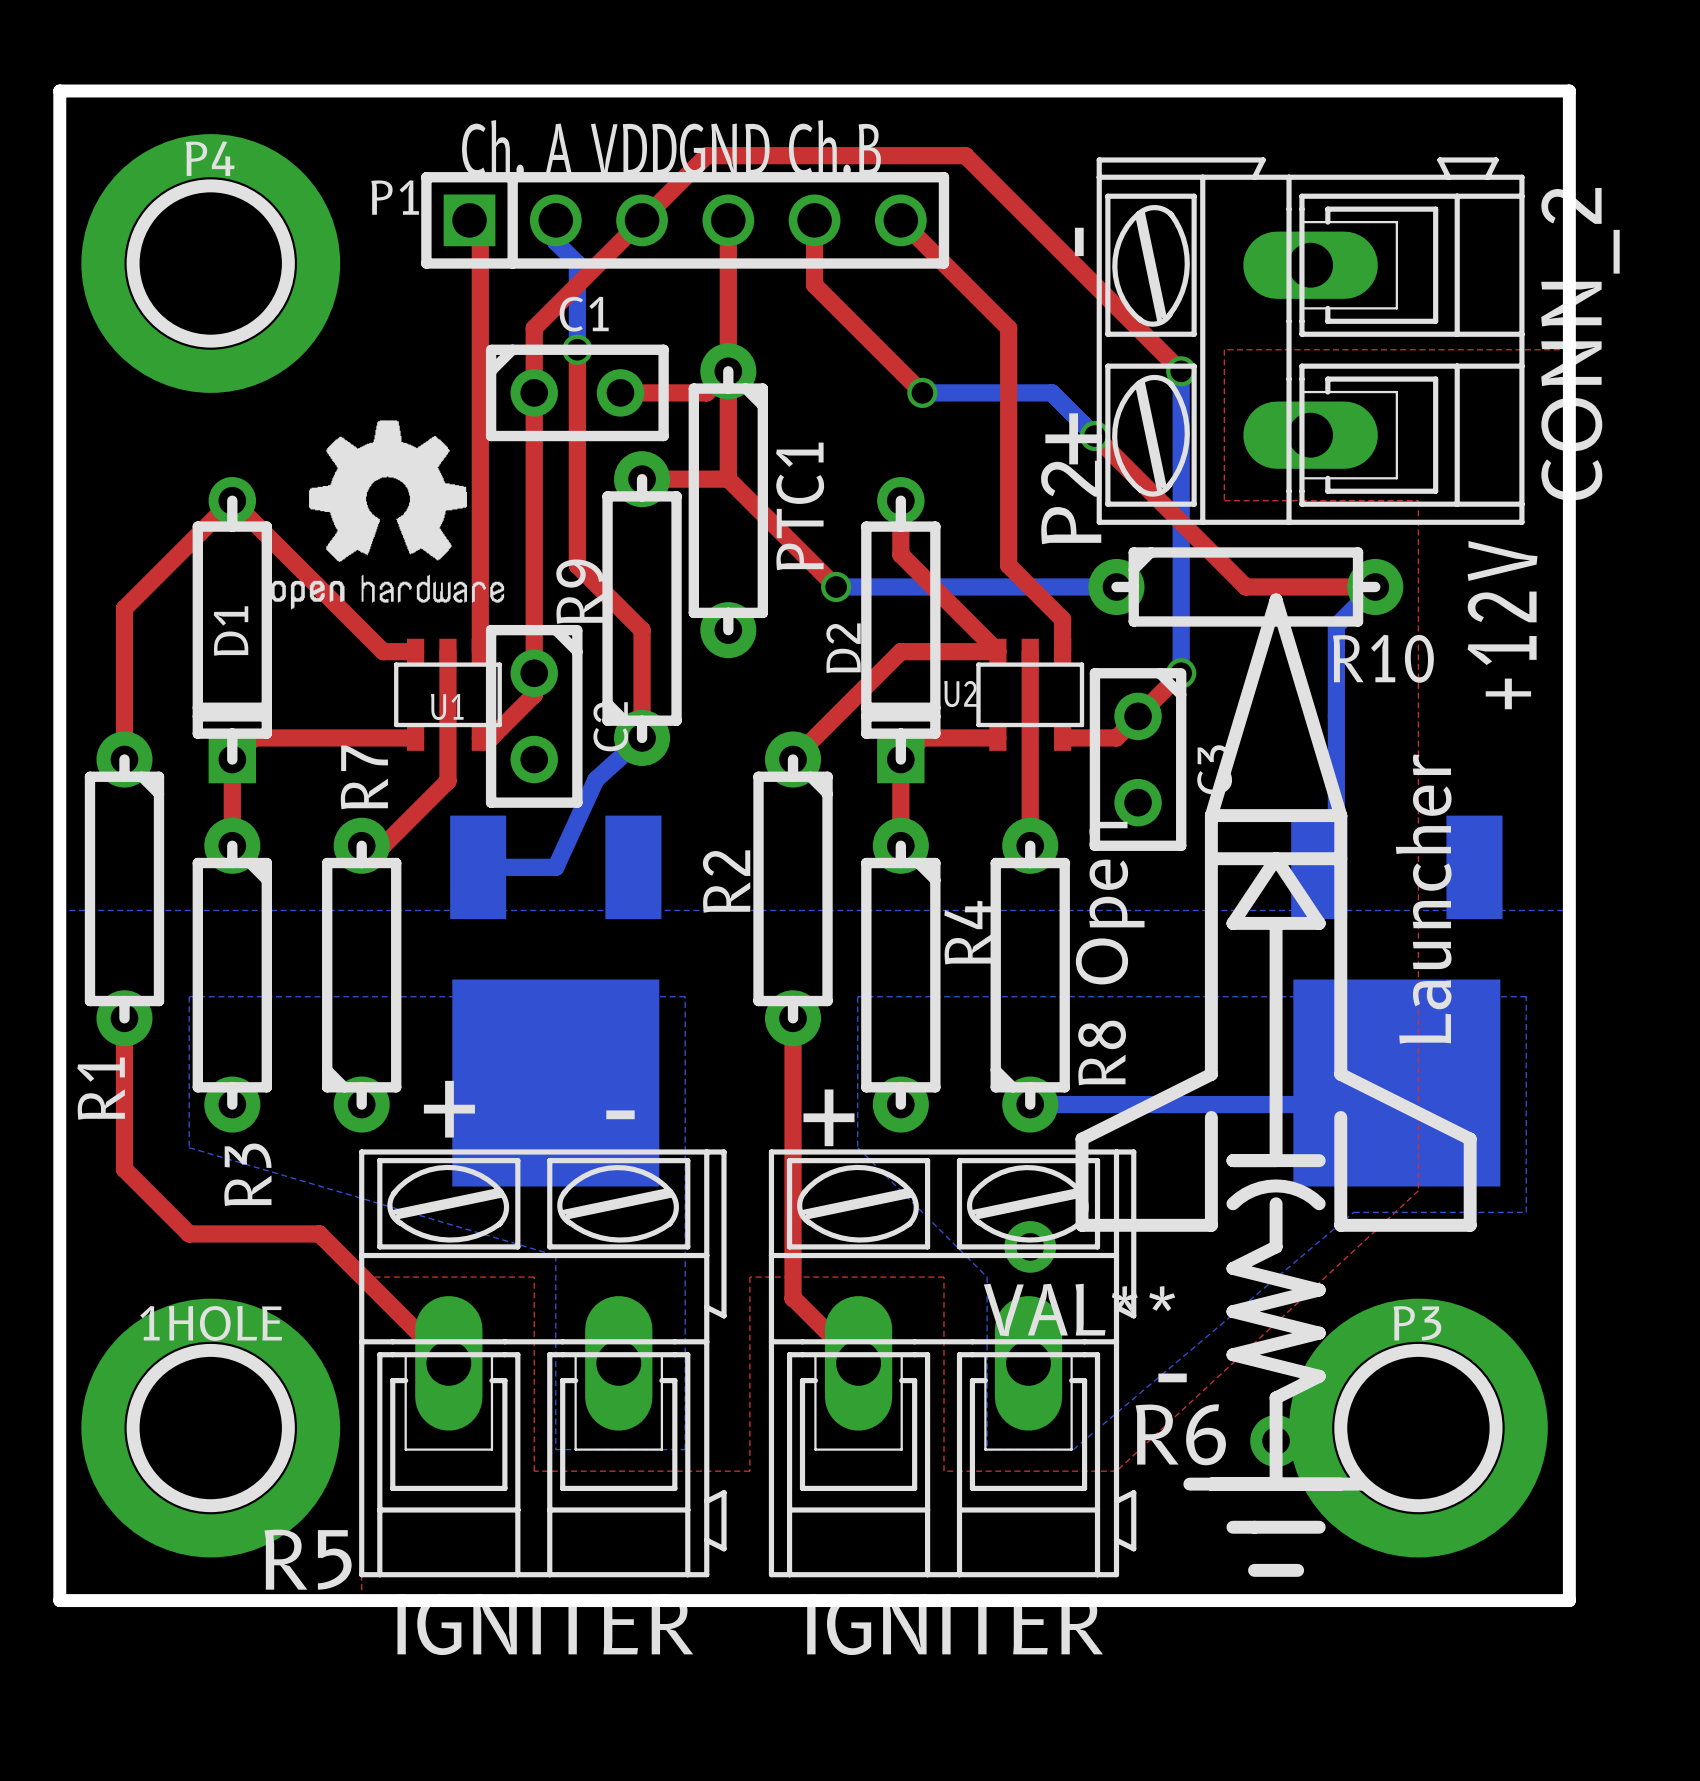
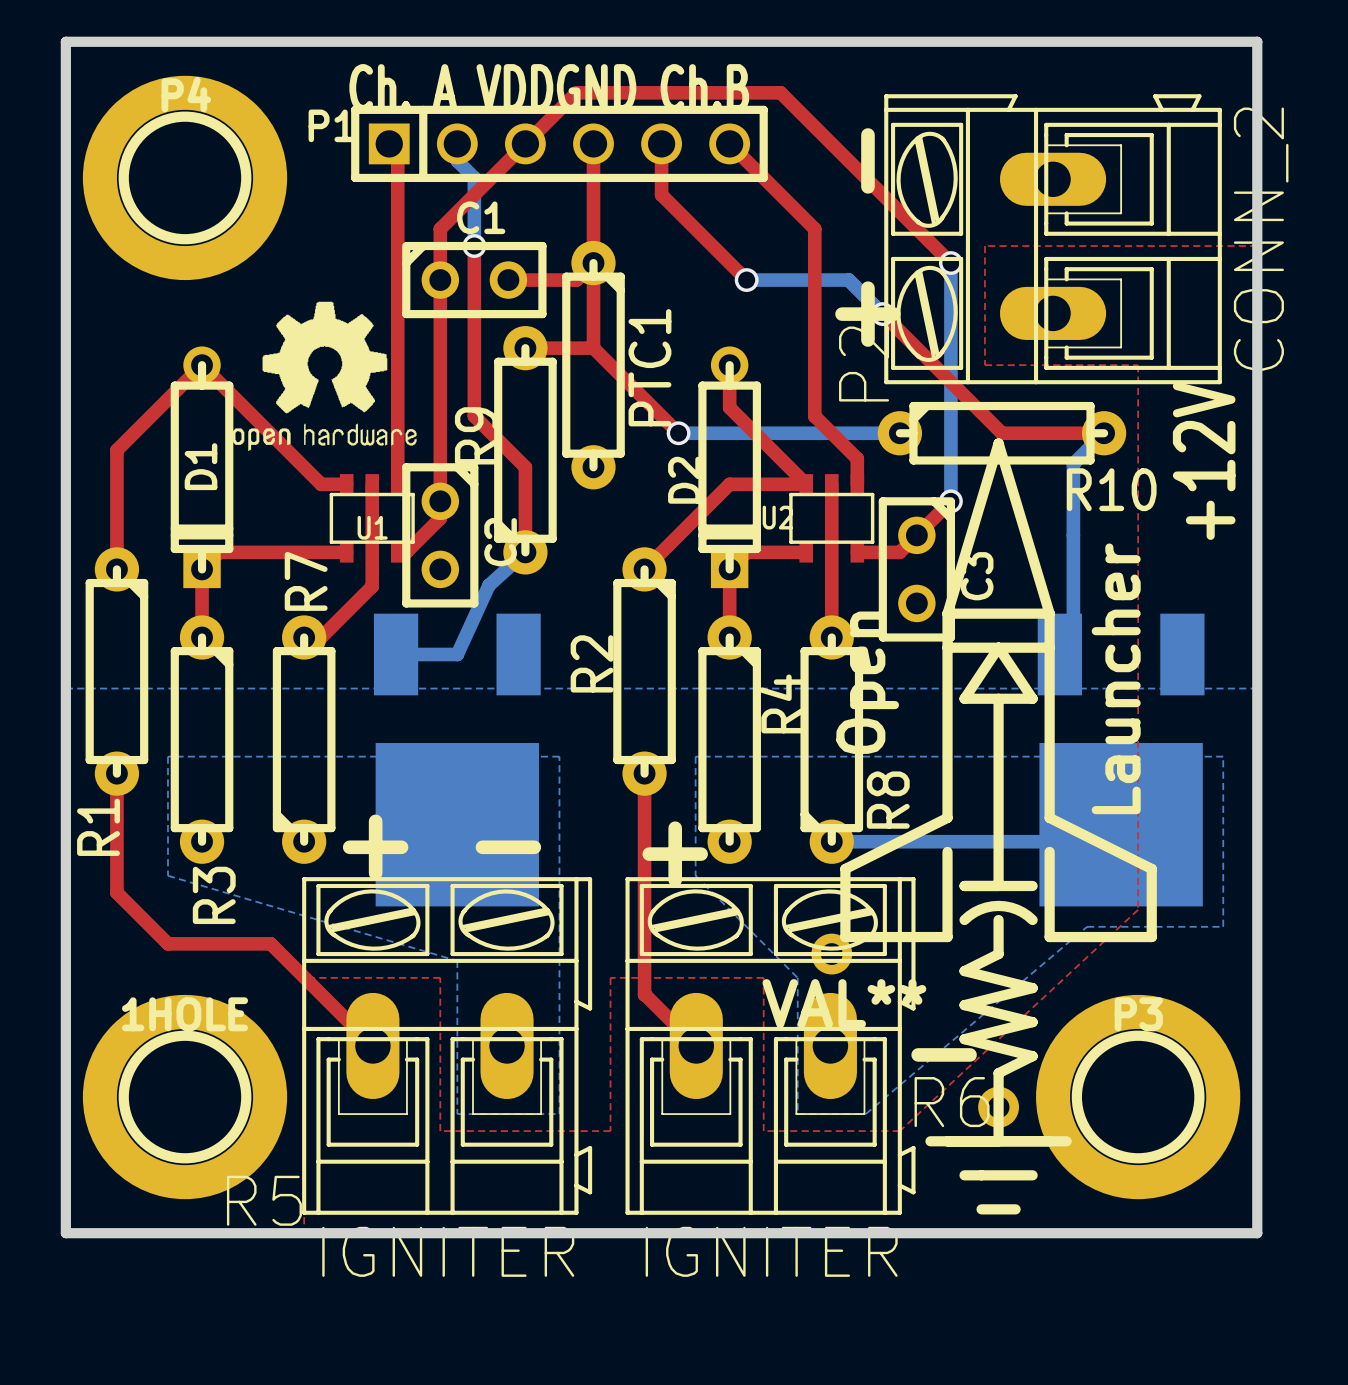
part position: (1276, 1085) -> (998, 826)

